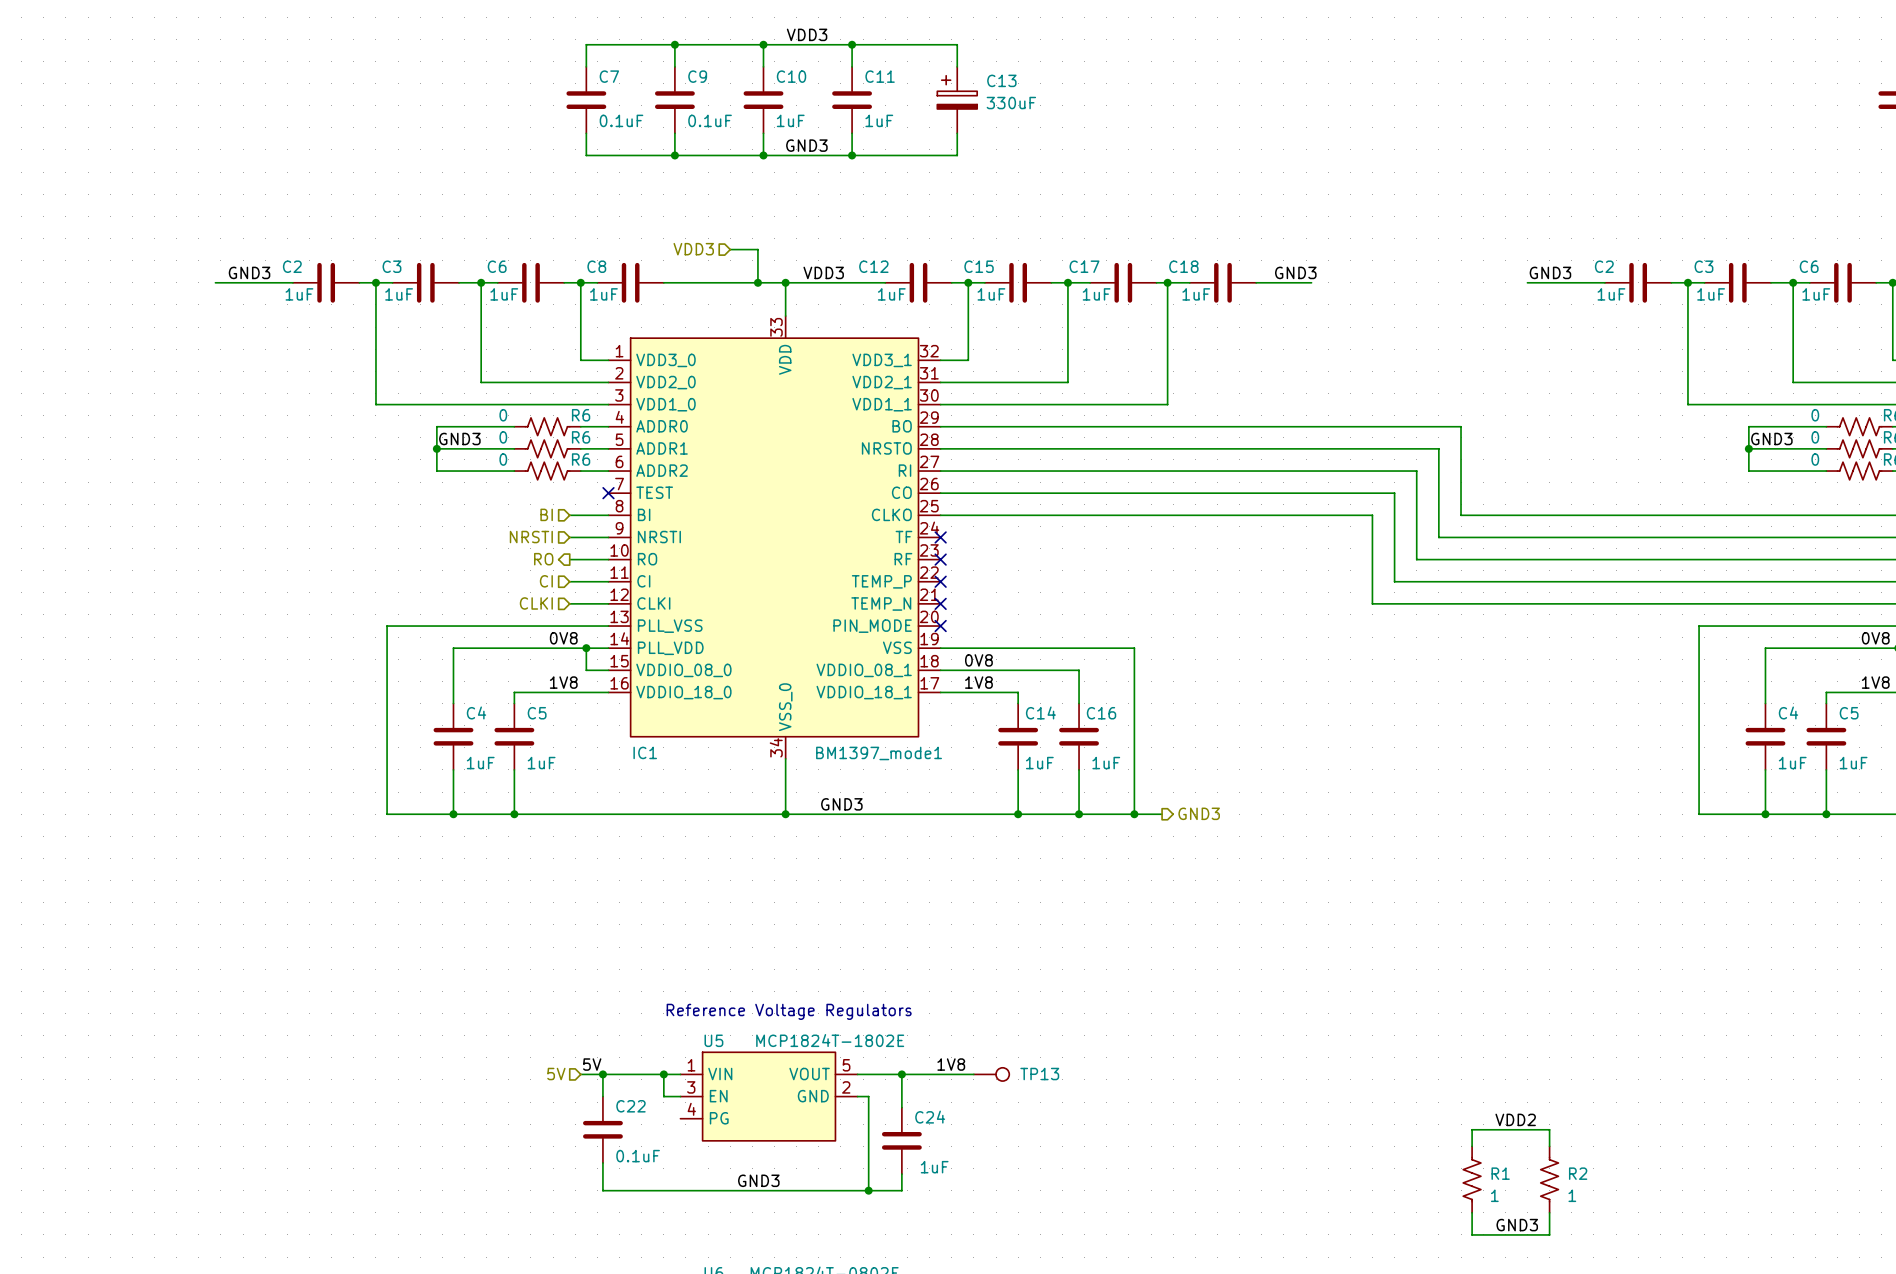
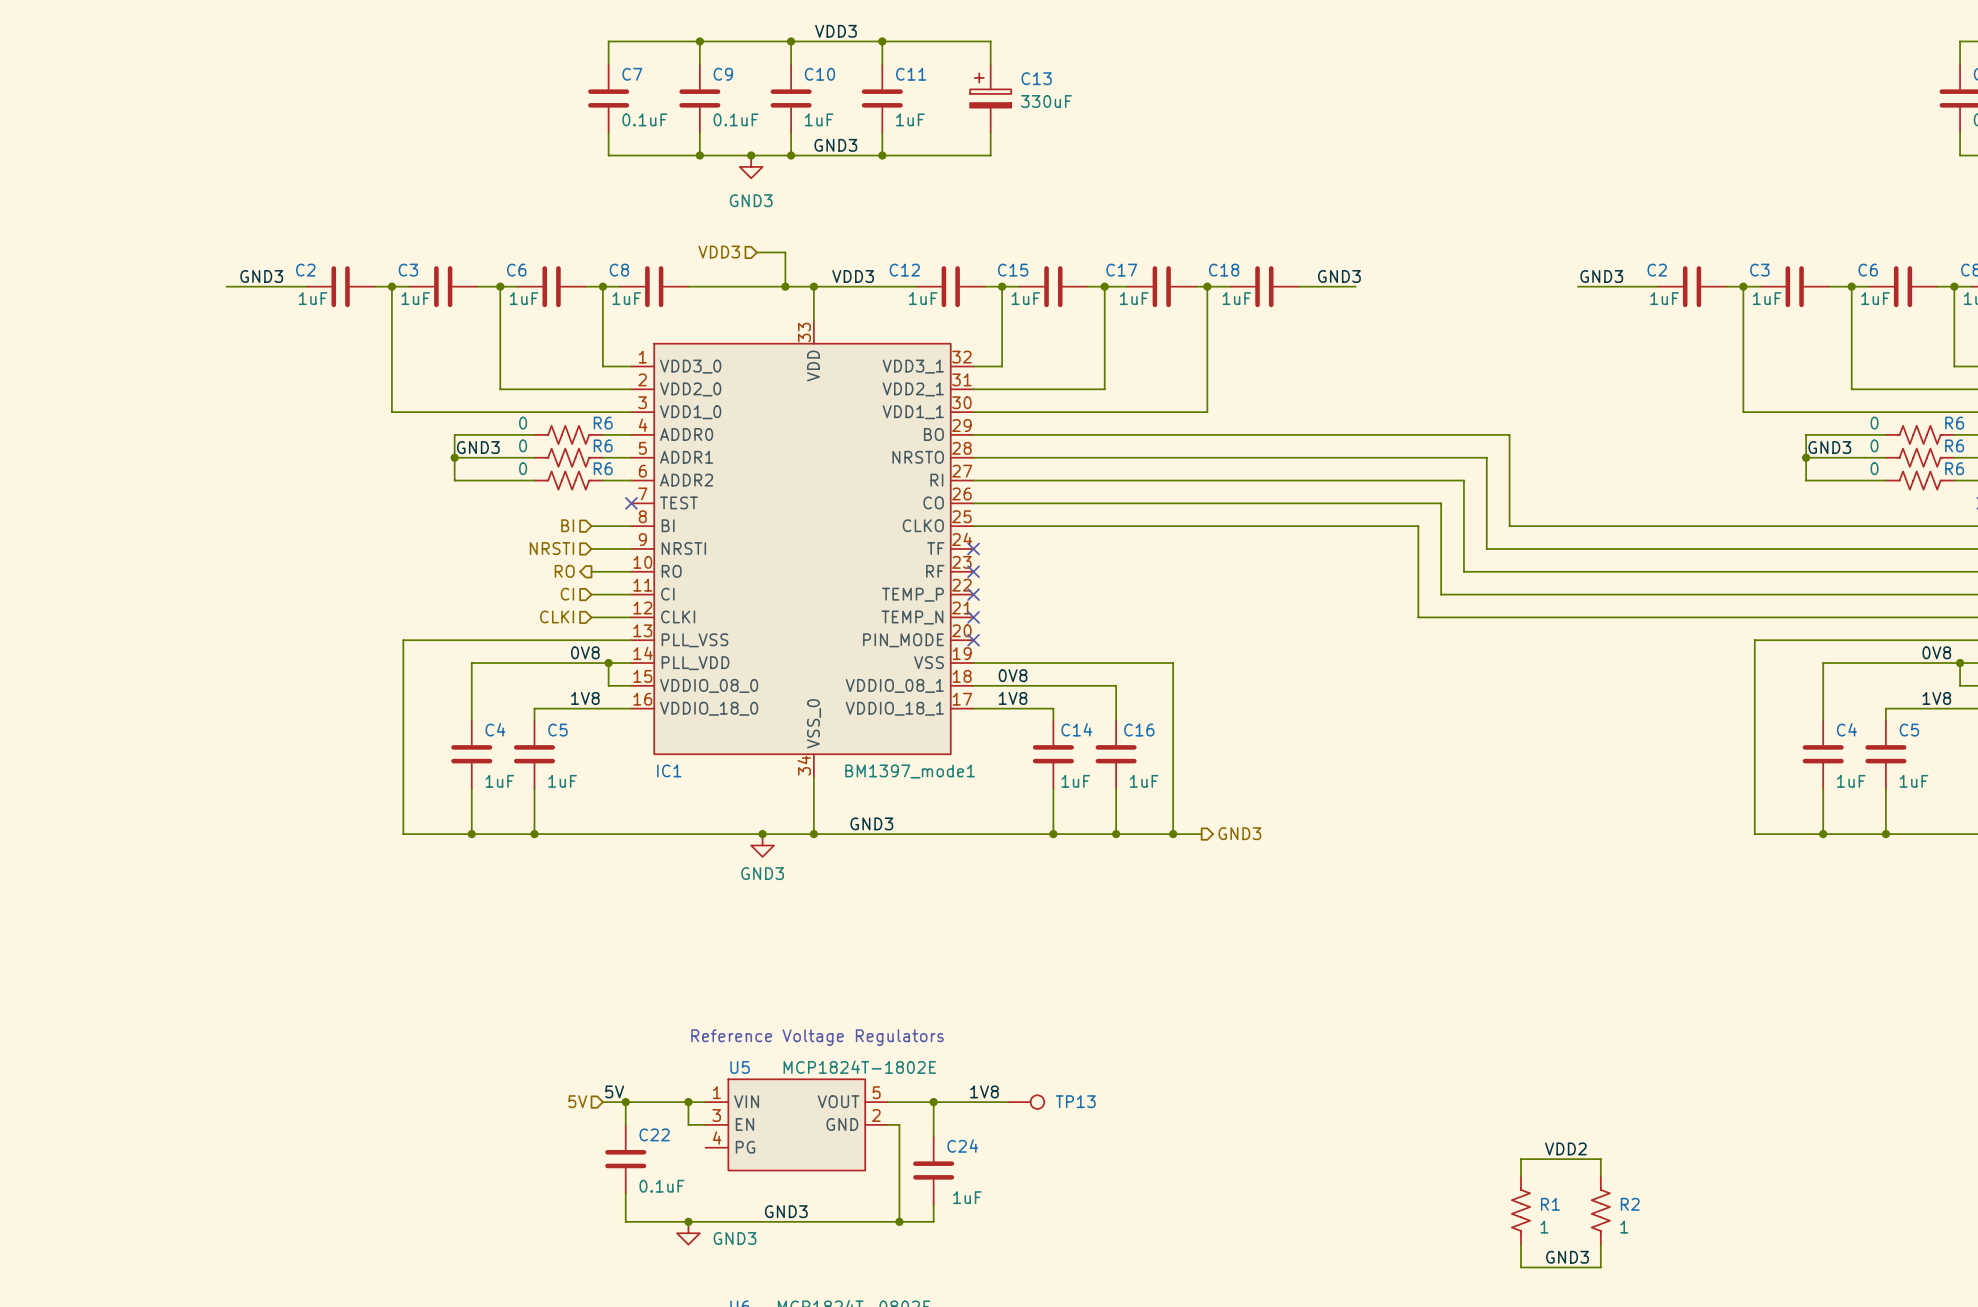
junction: none -> (751, 155)
power symbol: none -> GND3 (751, 166)
junction: none -> (762, 834)
power symbol: none -> GND3 (762, 845)
junction: none -> (688, 1221)
power symbol: none -> GND3 (688, 1233)

